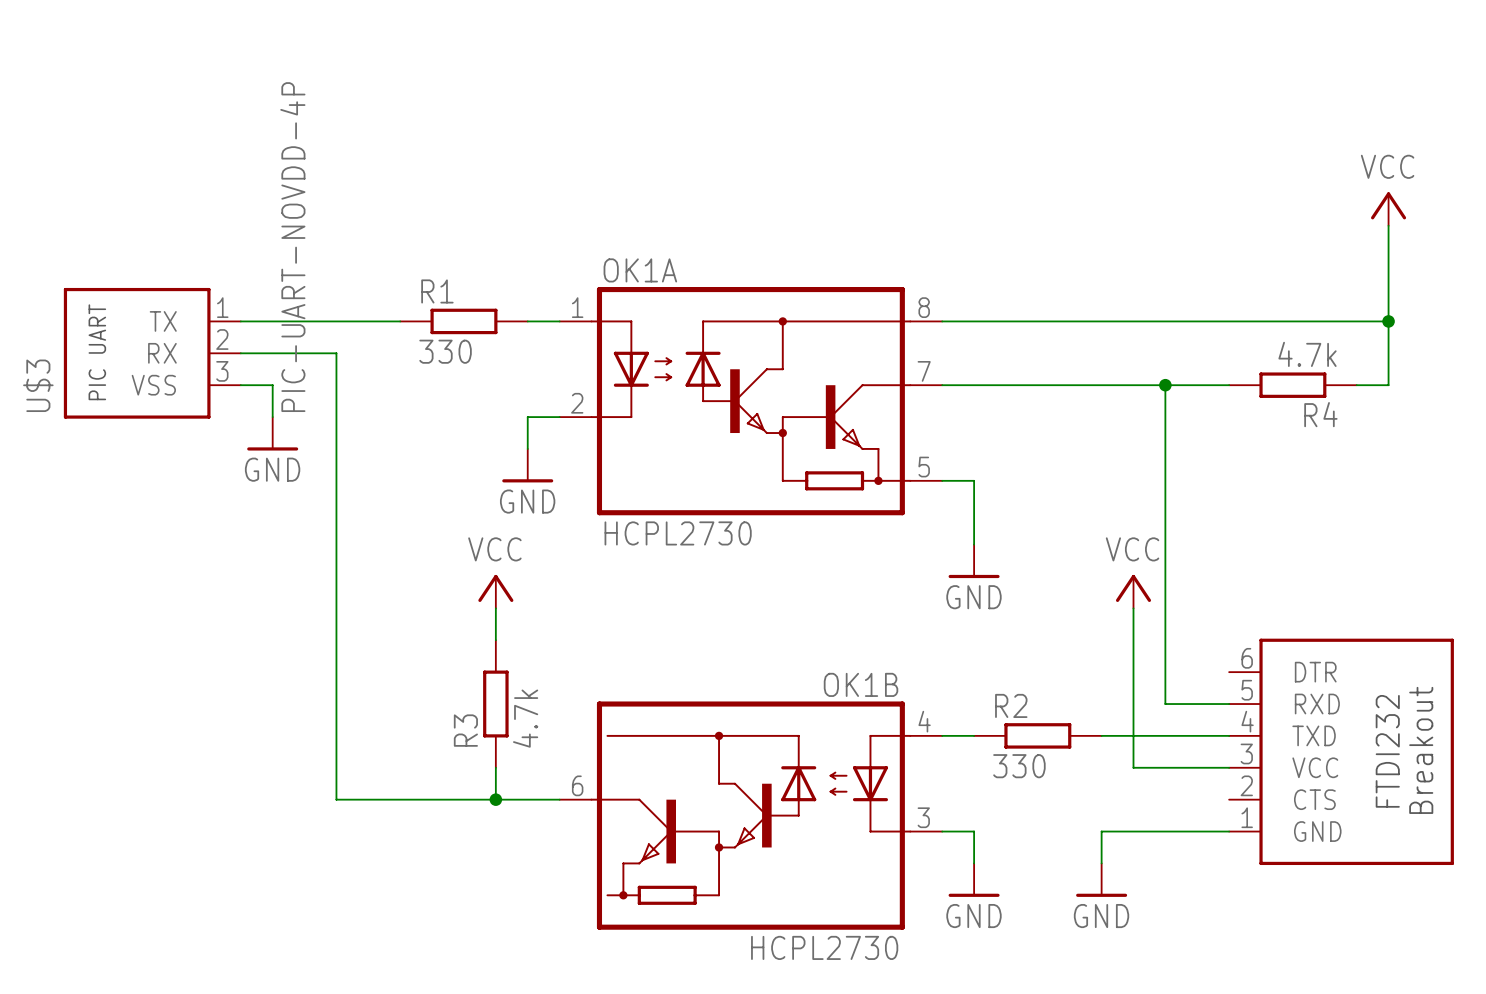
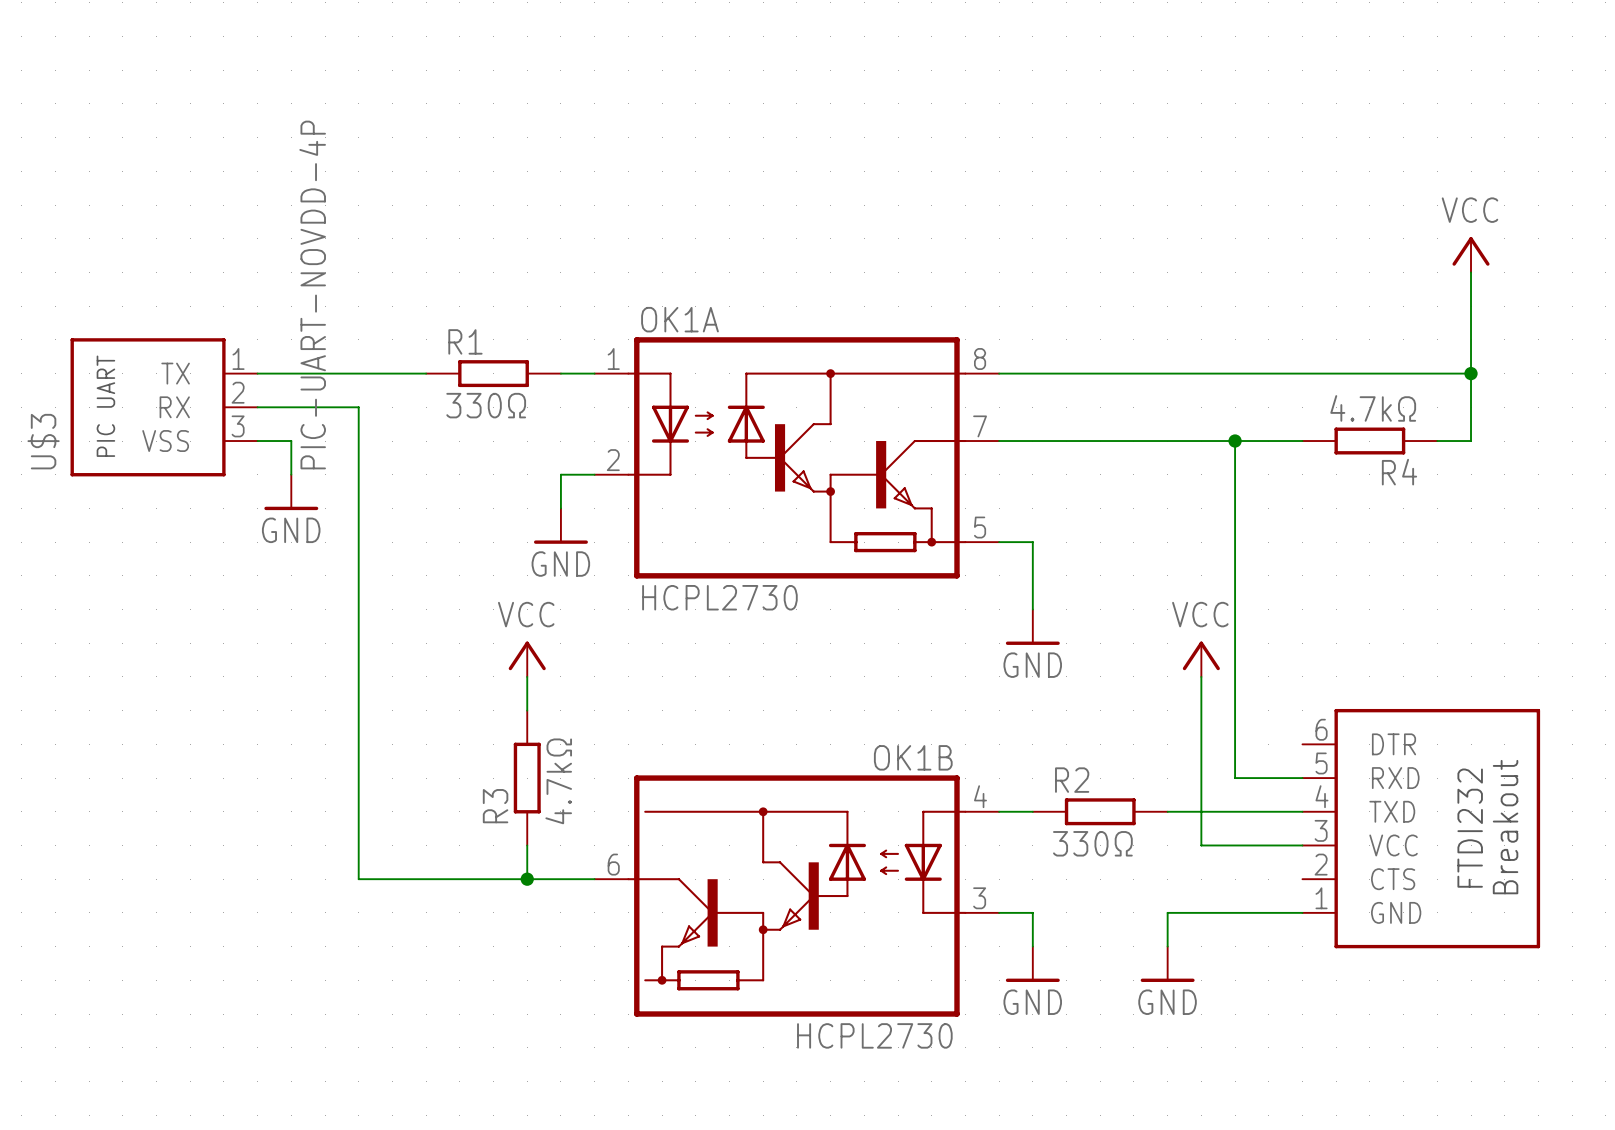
R1 value: 330 (445, 351) -> 330Ω (486, 405)
R4 value: 4.7k (1307, 354) -> 4.7kΩ (1373, 408)
R3 value: 4.7k (525, 718) -> 4.7kΩ (558, 781)
R2 value: 330 (1019, 766) -> 330Ω (1092, 843)

